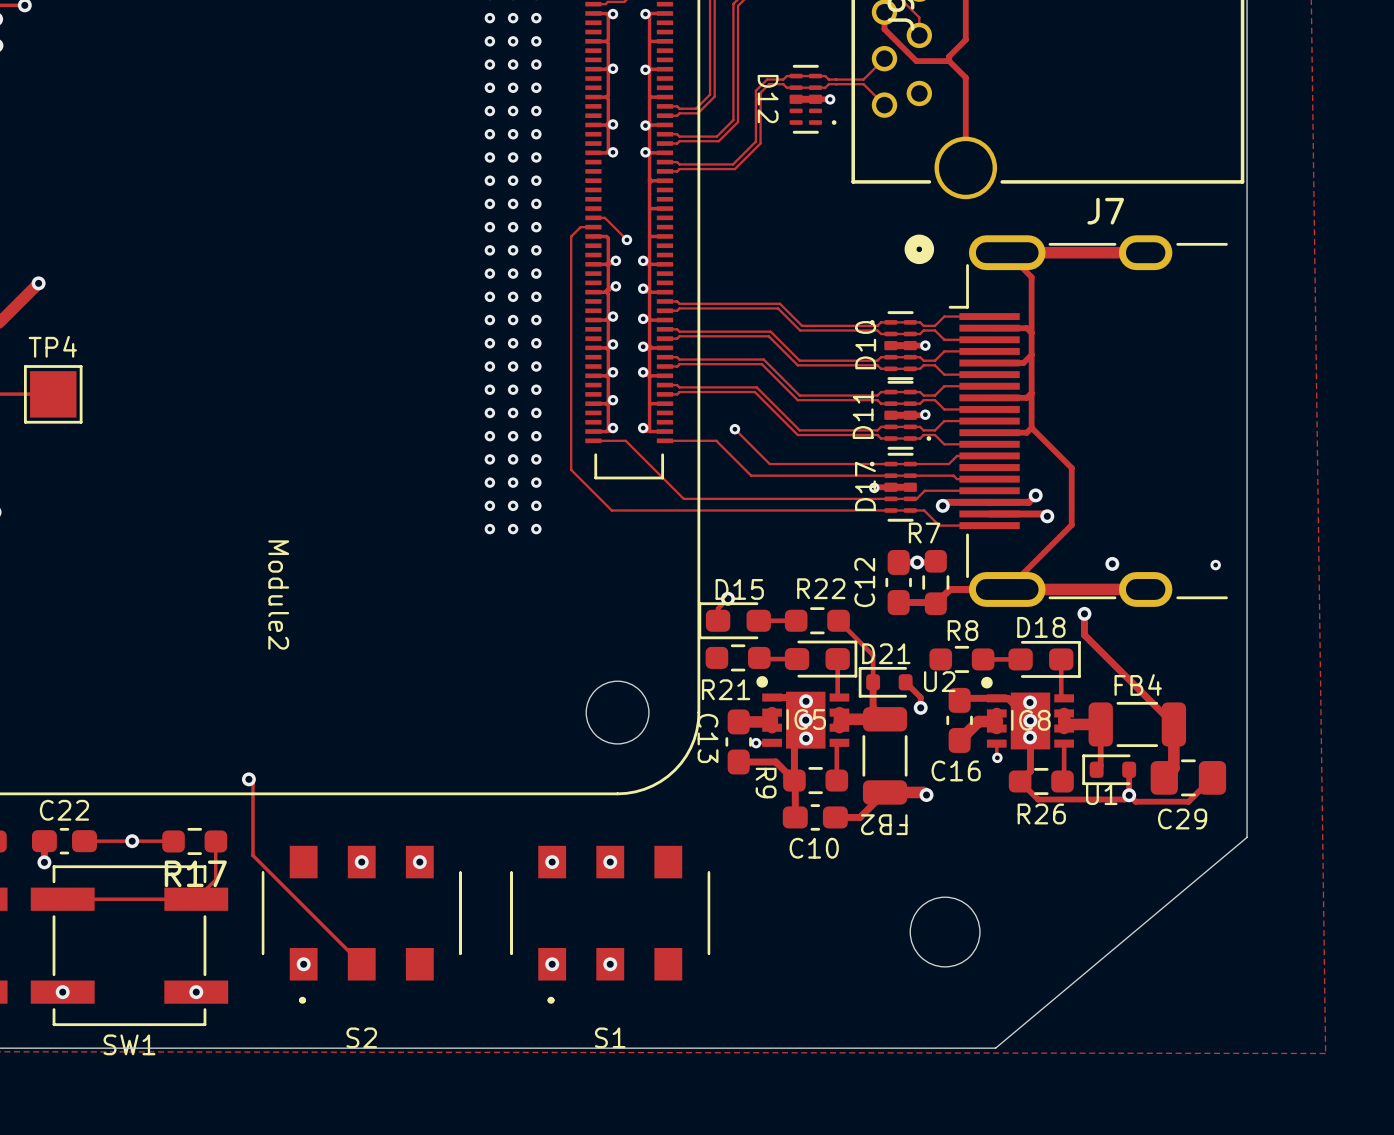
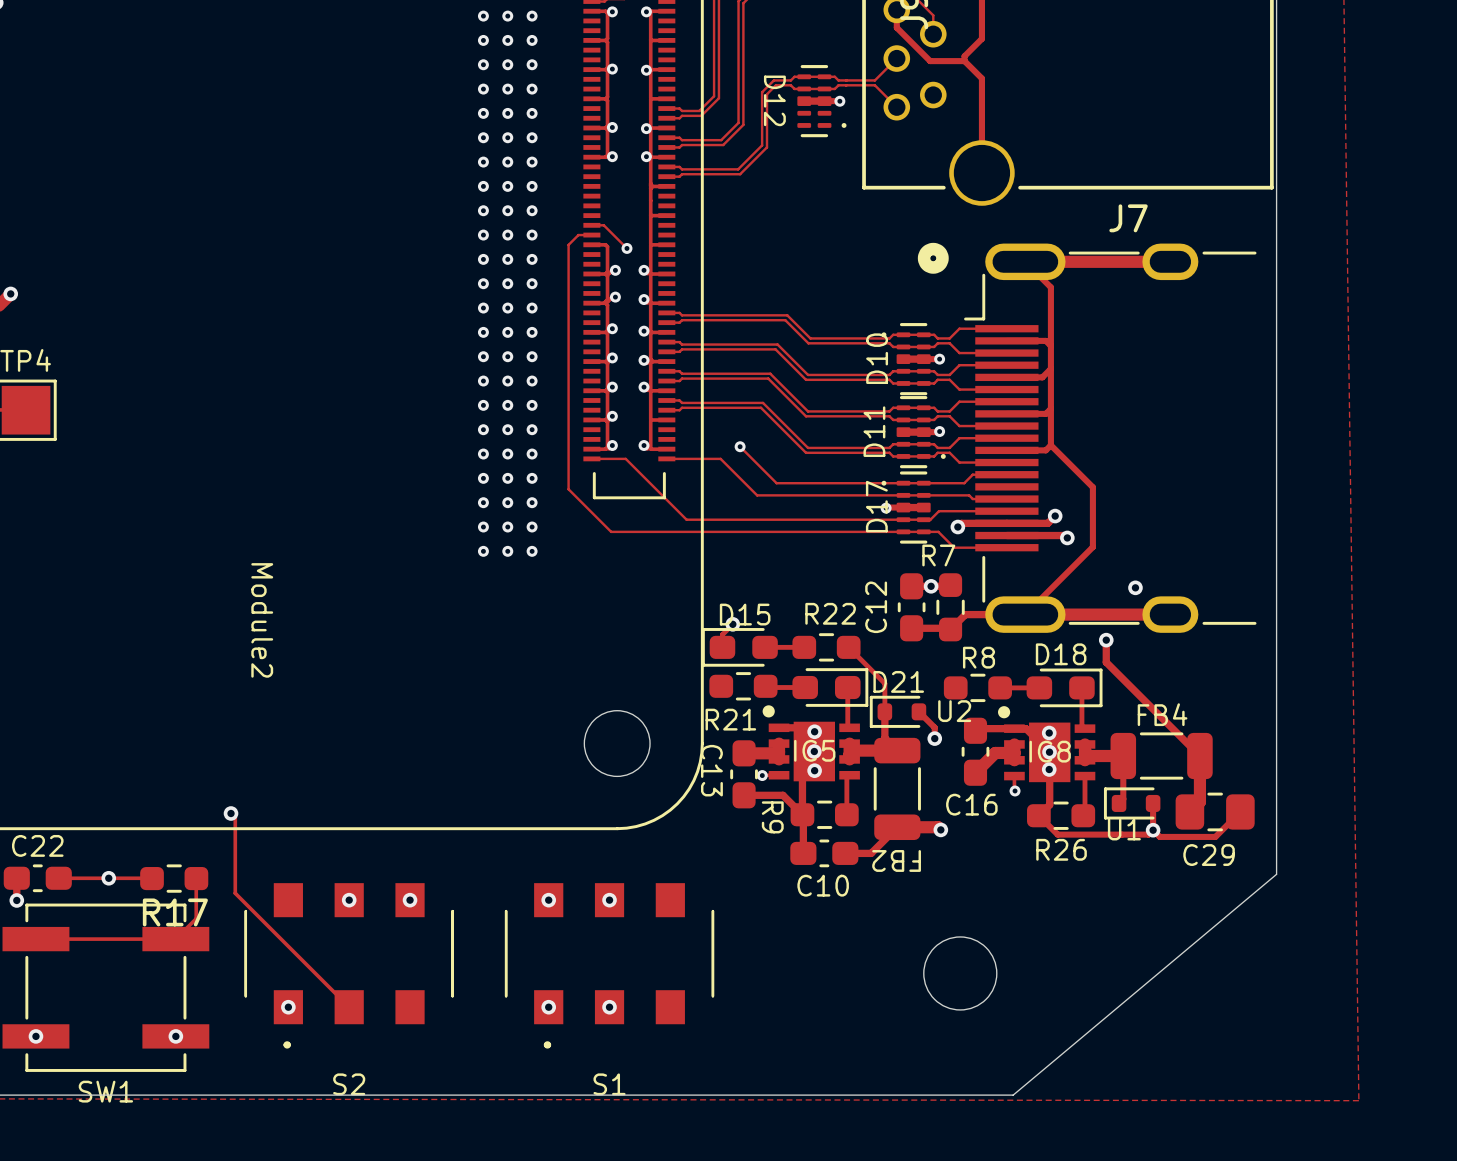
via: (1215, 565) -> none

